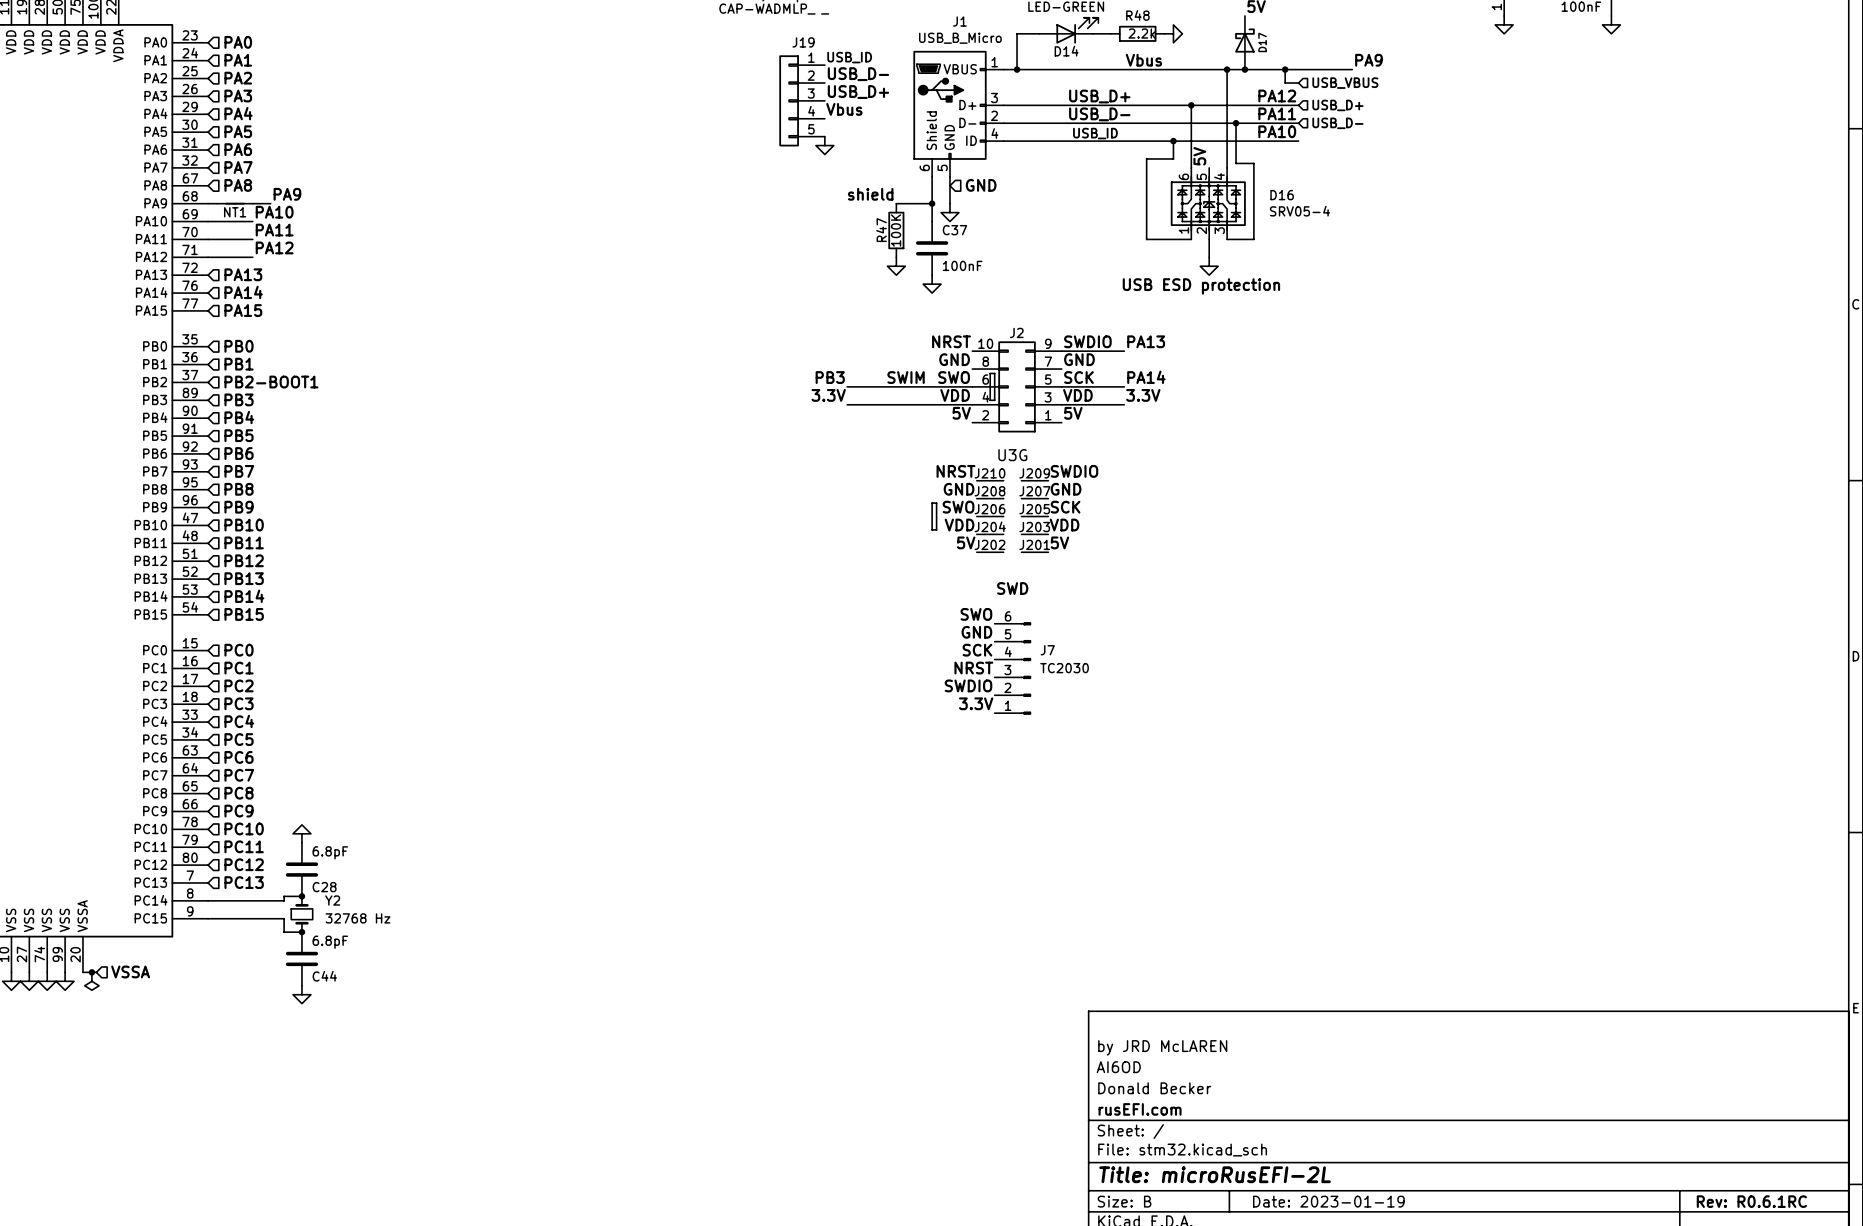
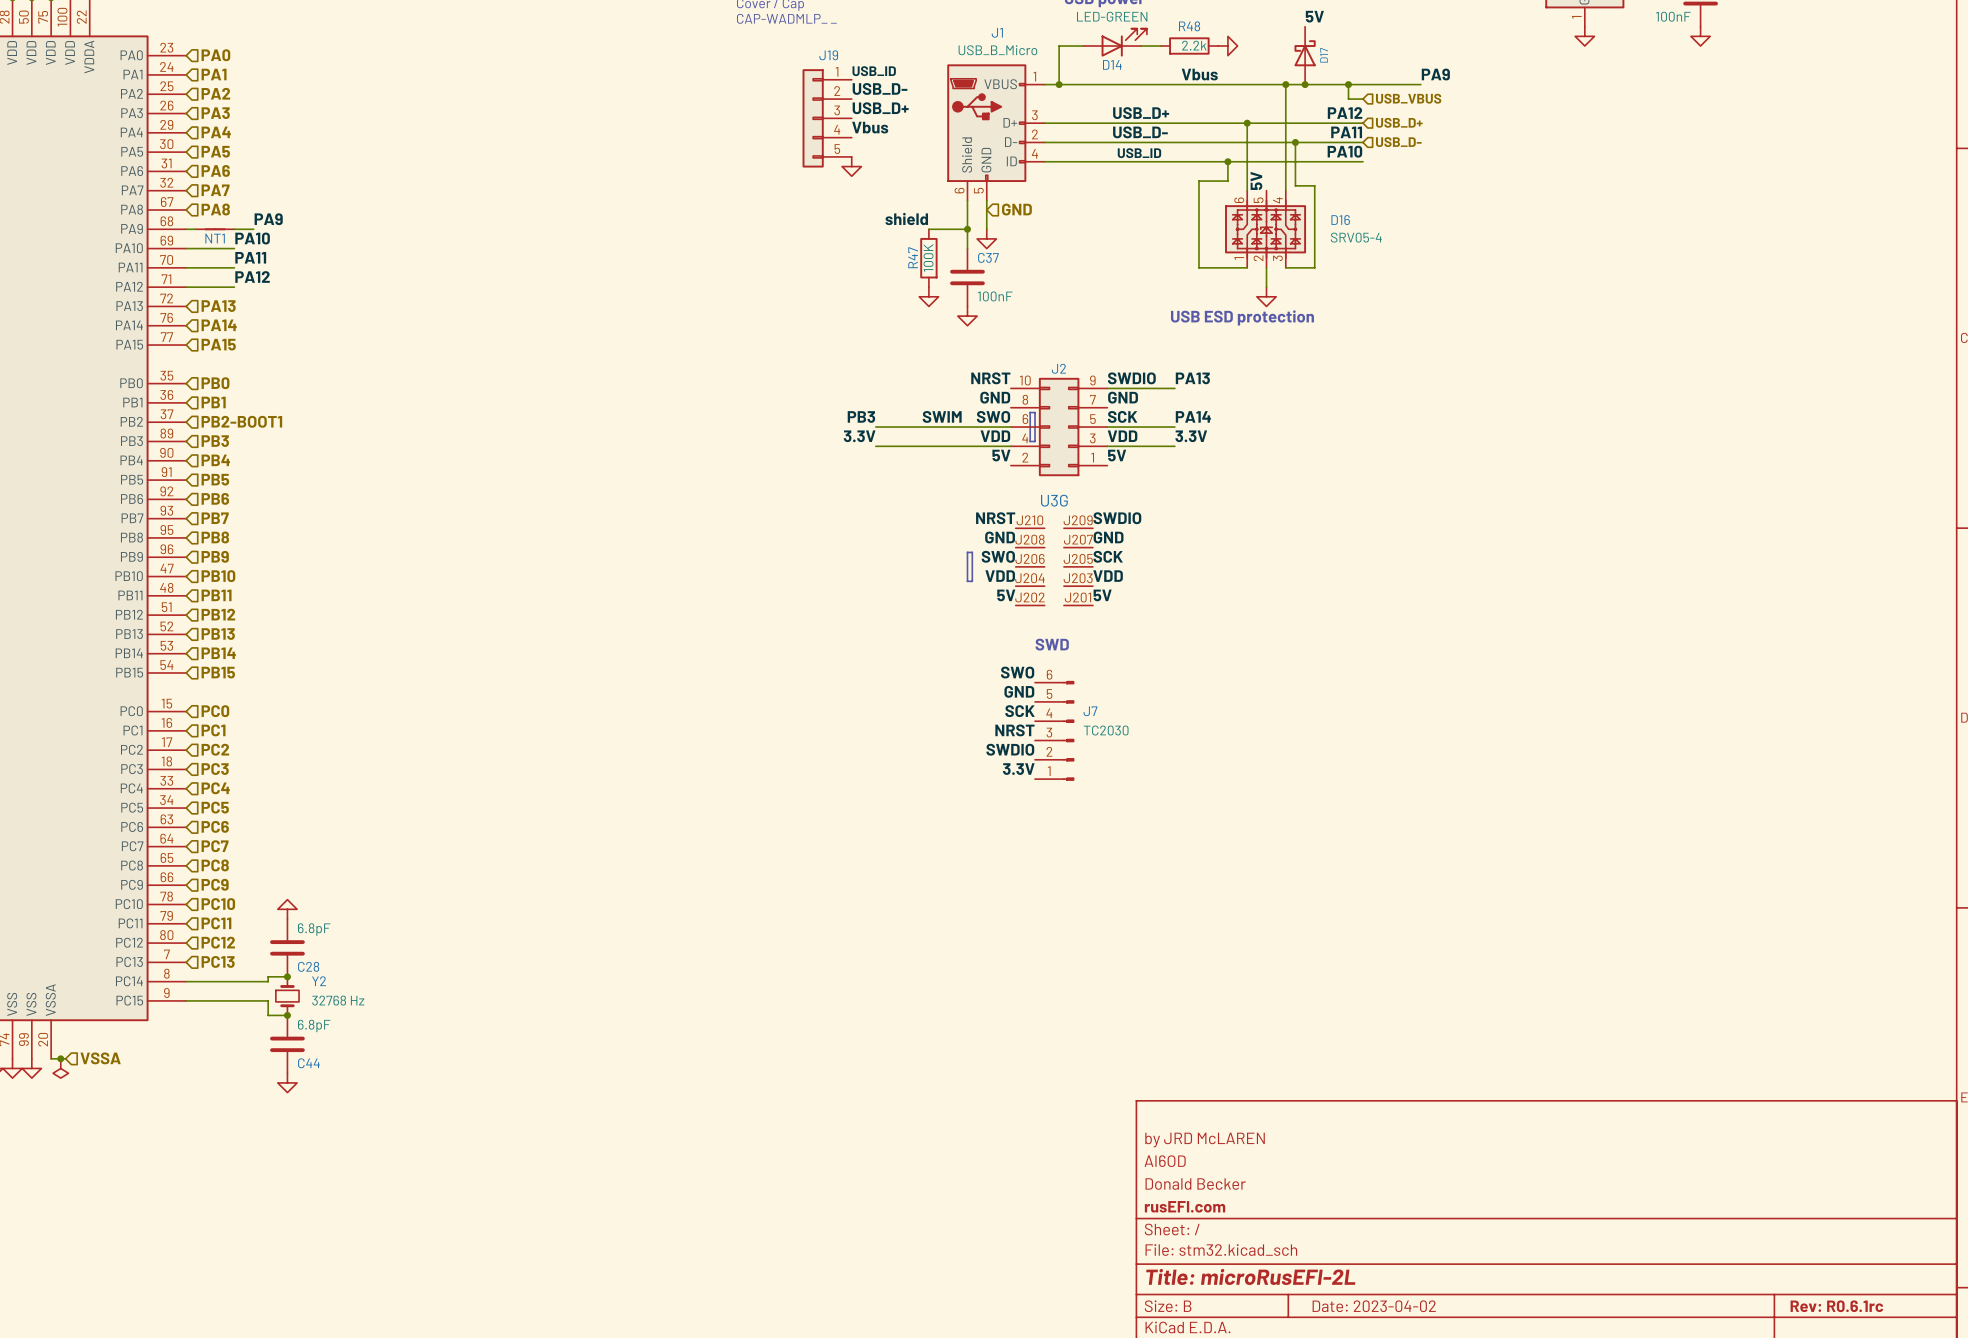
title block: Date: 2023-01-19 (1328, 1201) -> Date: 2023-04-02 (1374, 1306)
title block: Rev: R0.6.1RC (1751, 1201) -> Rev: R0.6.1rc (1836, 1306)

